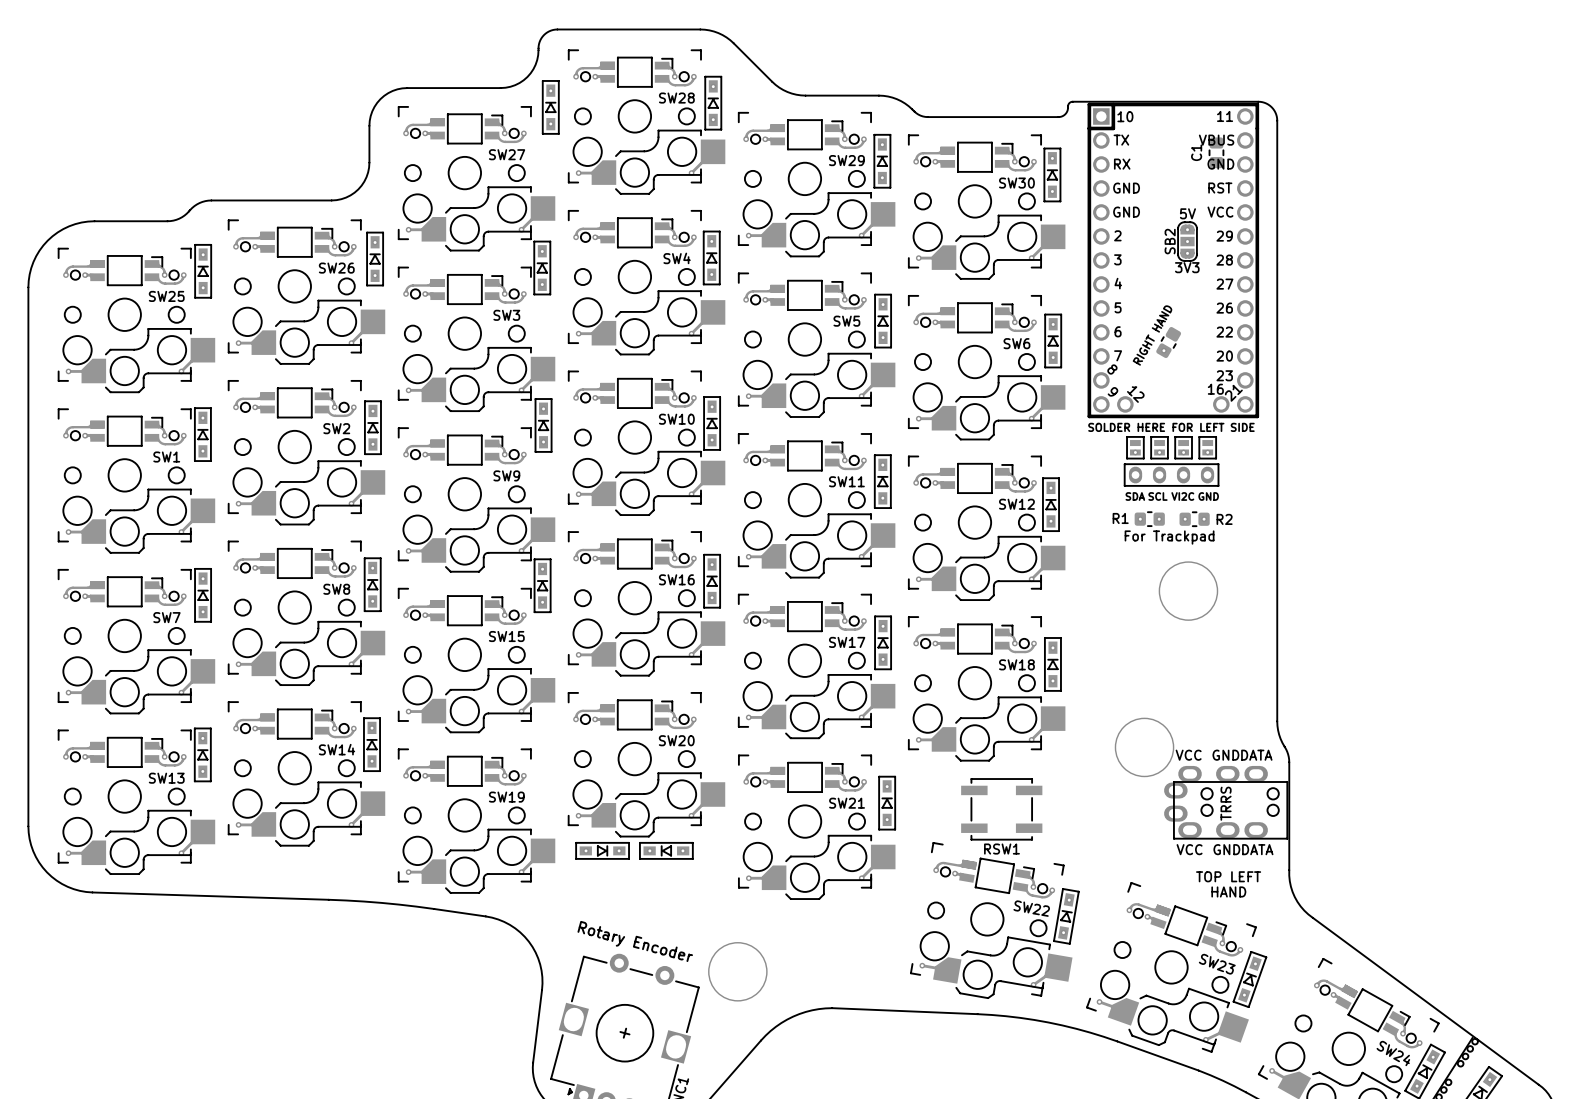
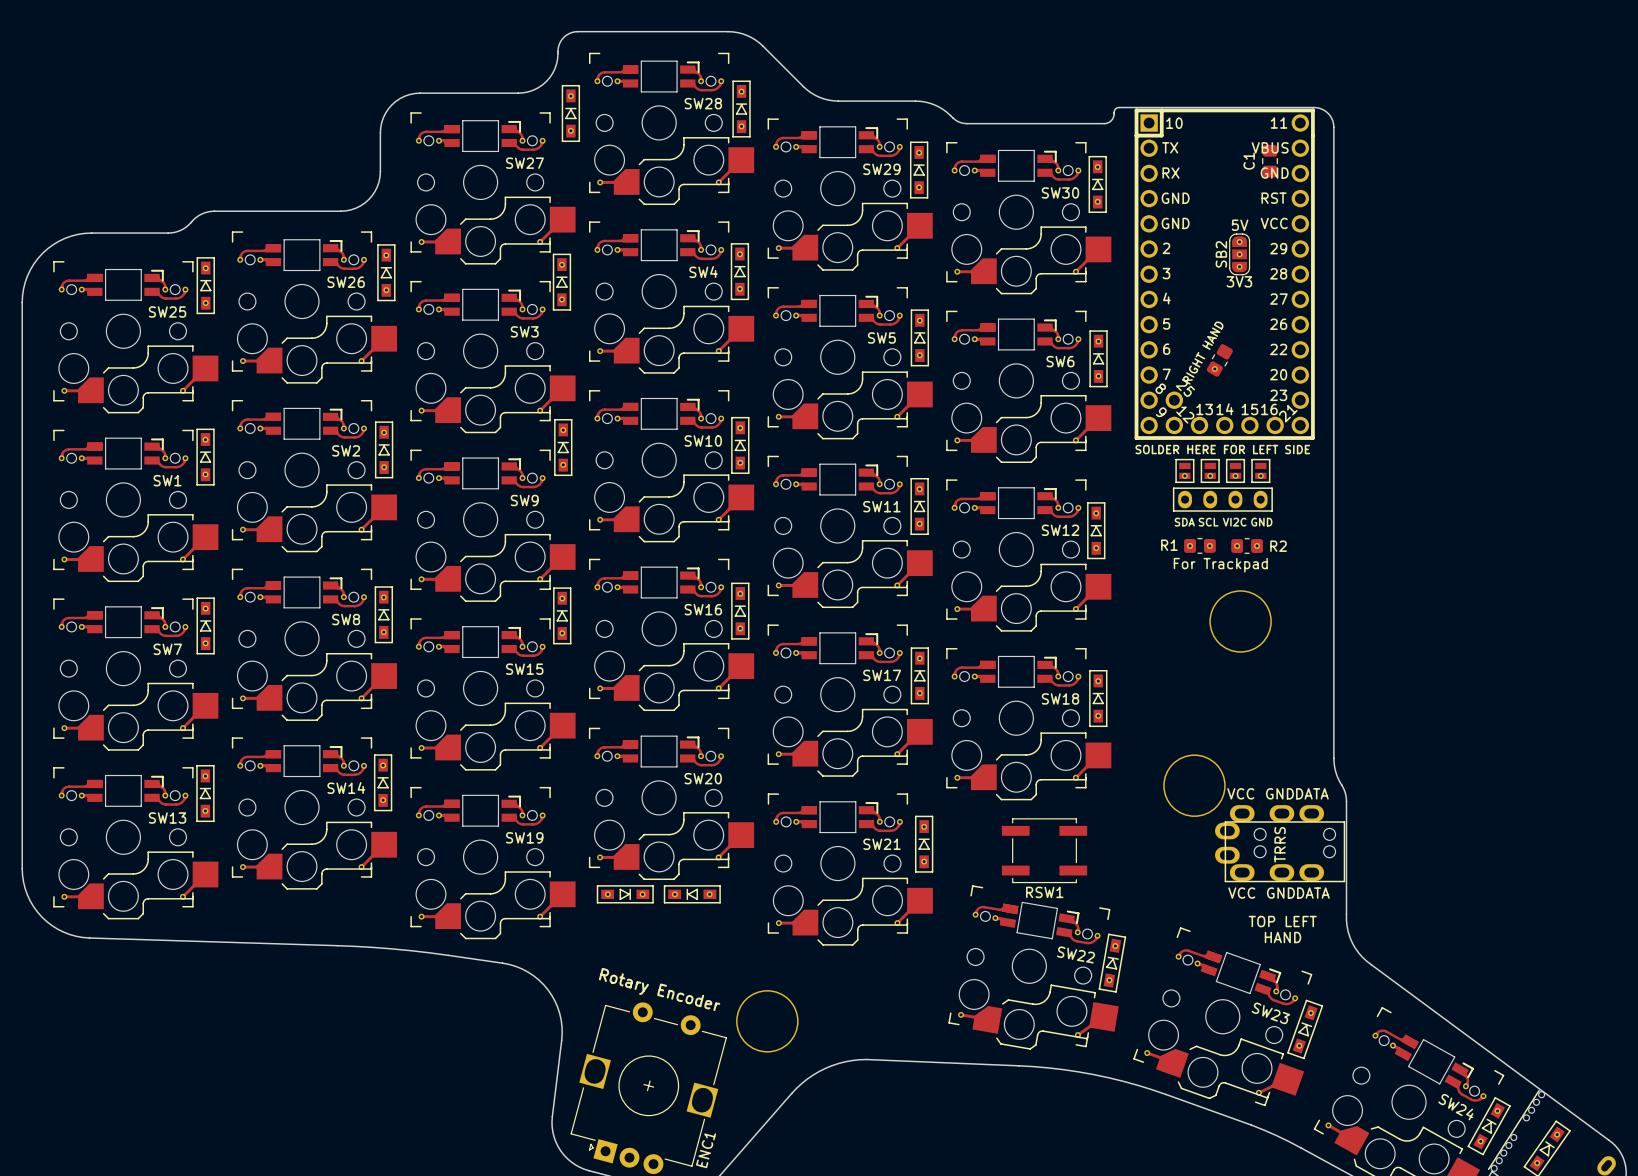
part footprint: [1087, 102, 1260, 419] -> [1134, 108, 1315, 440]

